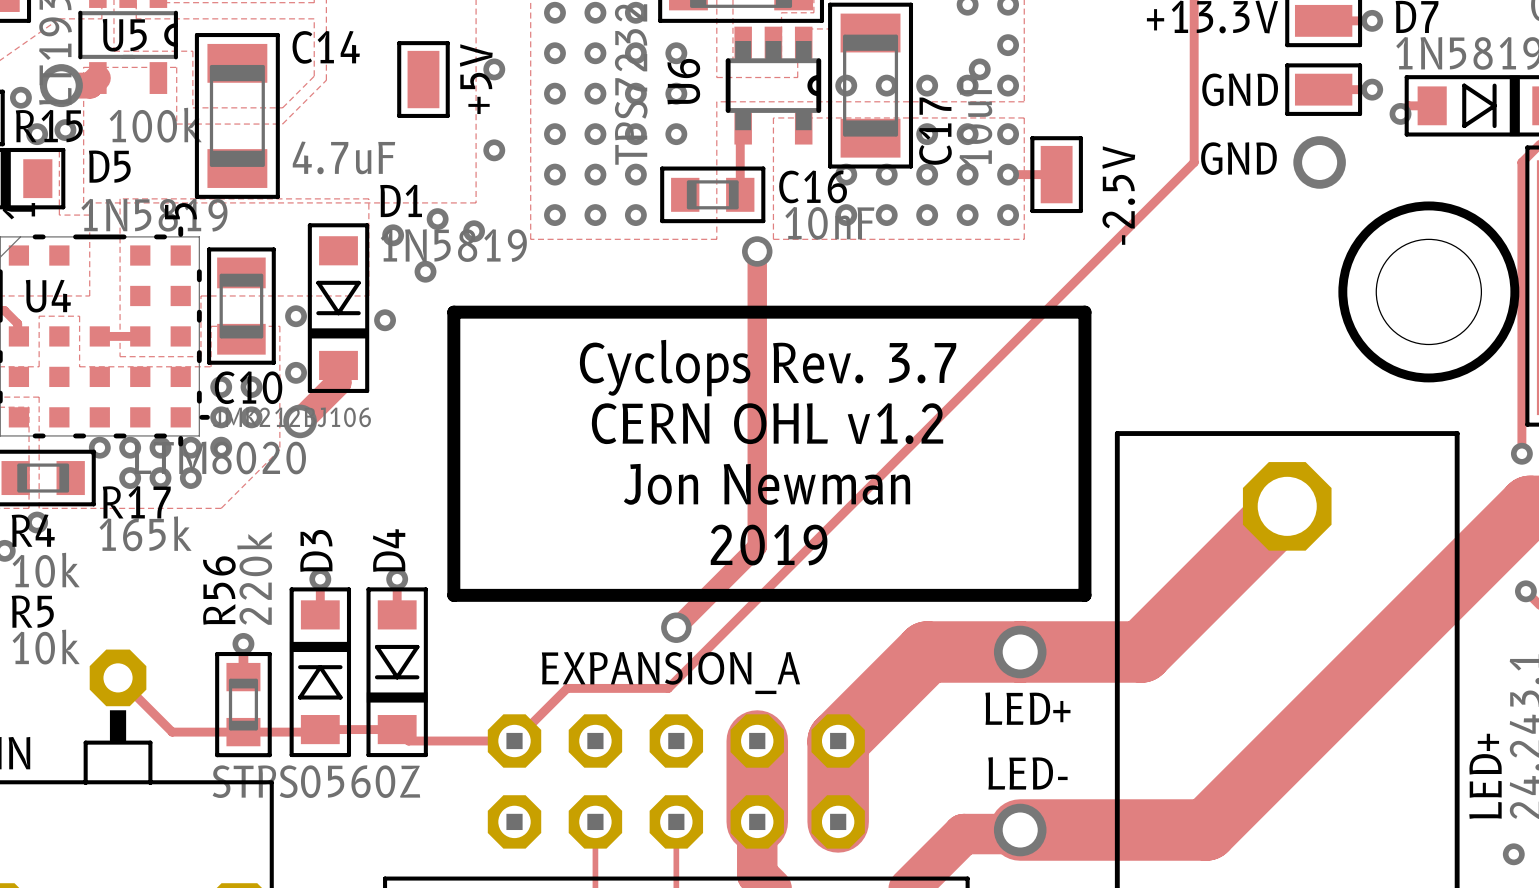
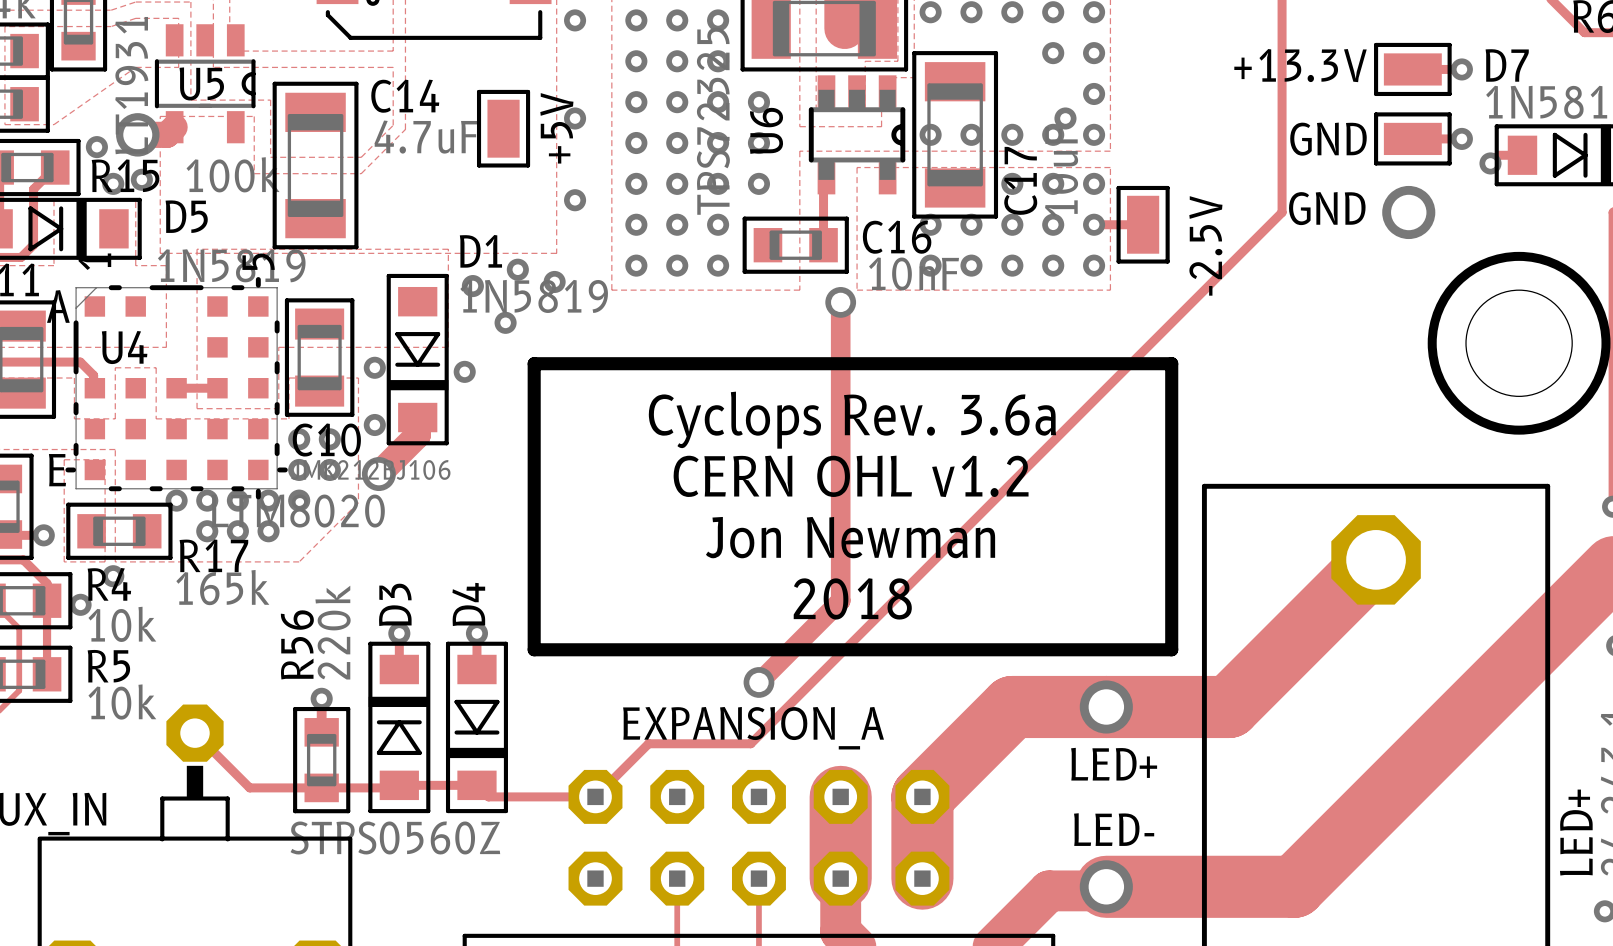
C14 value position: 4.7uF (343, 157) -> 4.7uF (426, 137)
text: Cyclops Rev. 3.7 (768, 368) -> Cyclops Rev. 3.6a (852, 420)
text: 2019 (769, 545) -> 2018 (852, 598)

